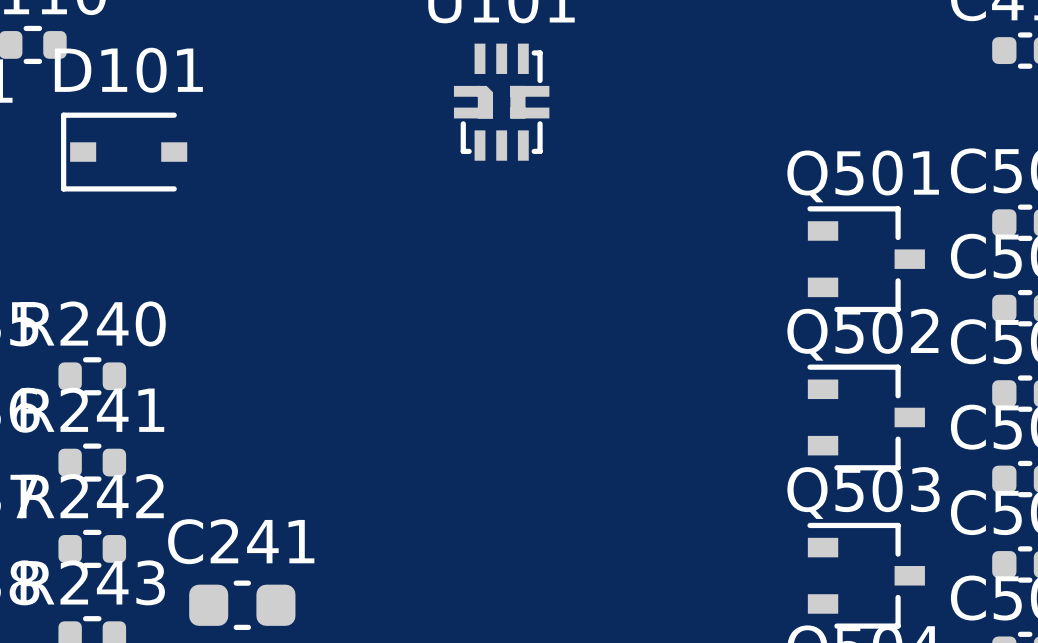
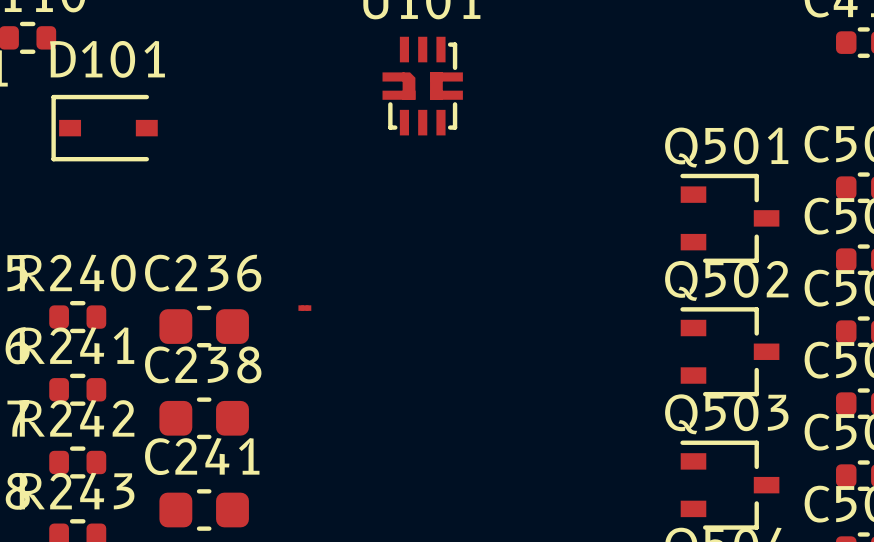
part: none -> (304, 308)
C236: none -> (204, 326)
C238: none -> (204, 418)

